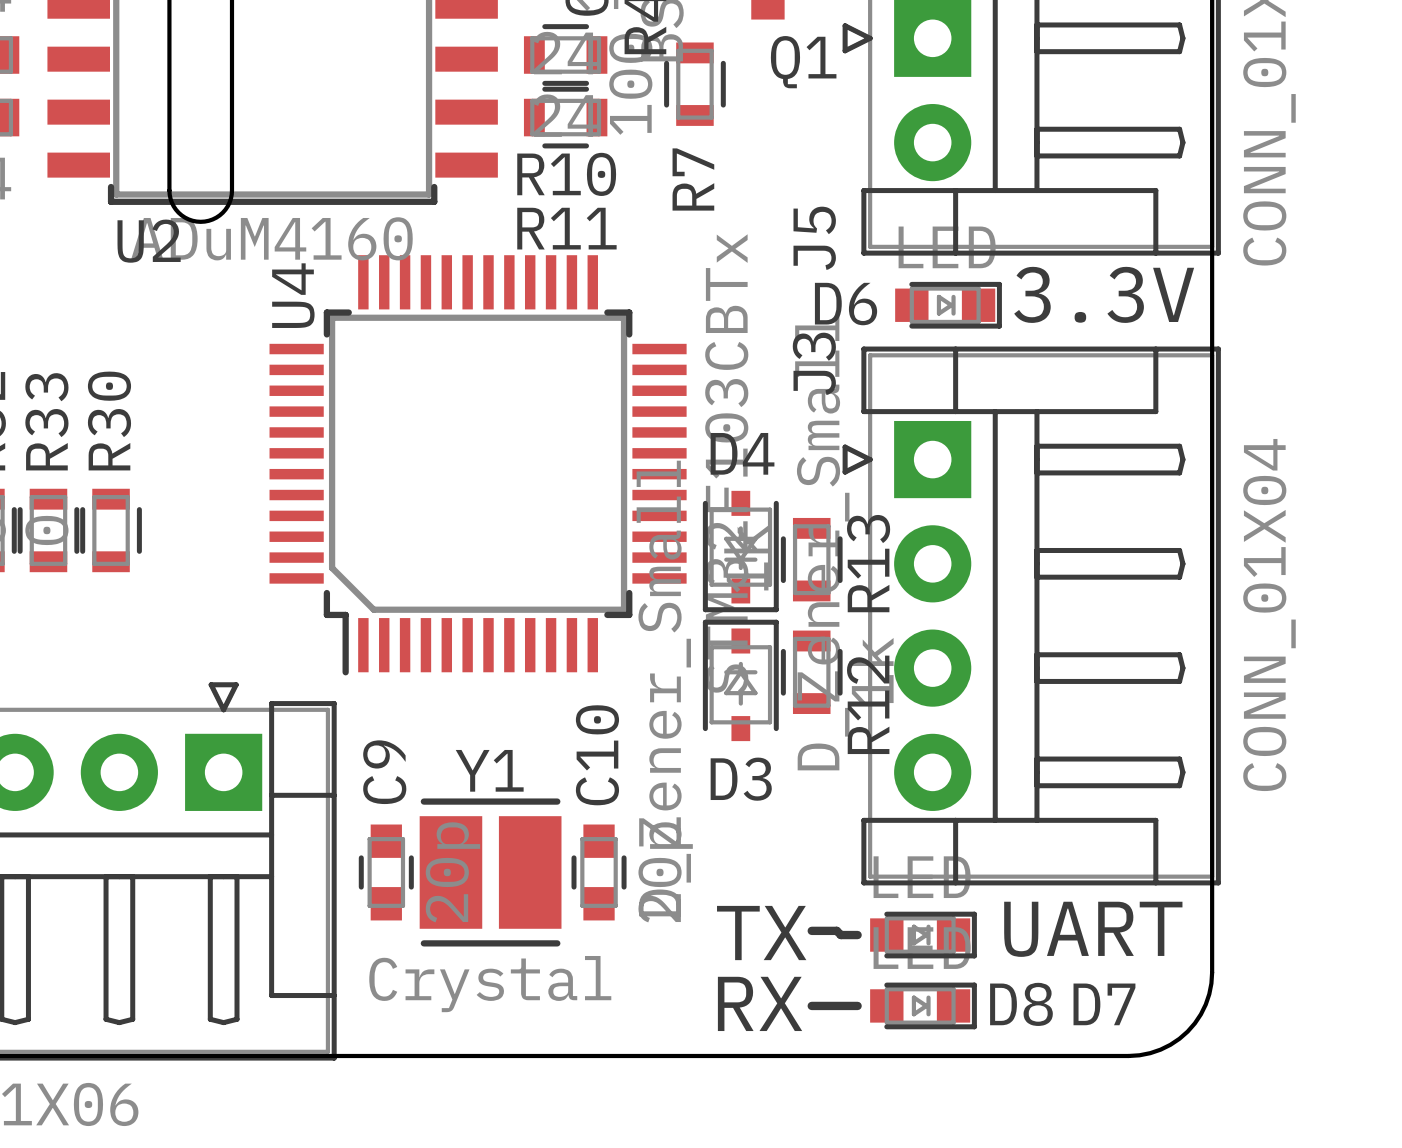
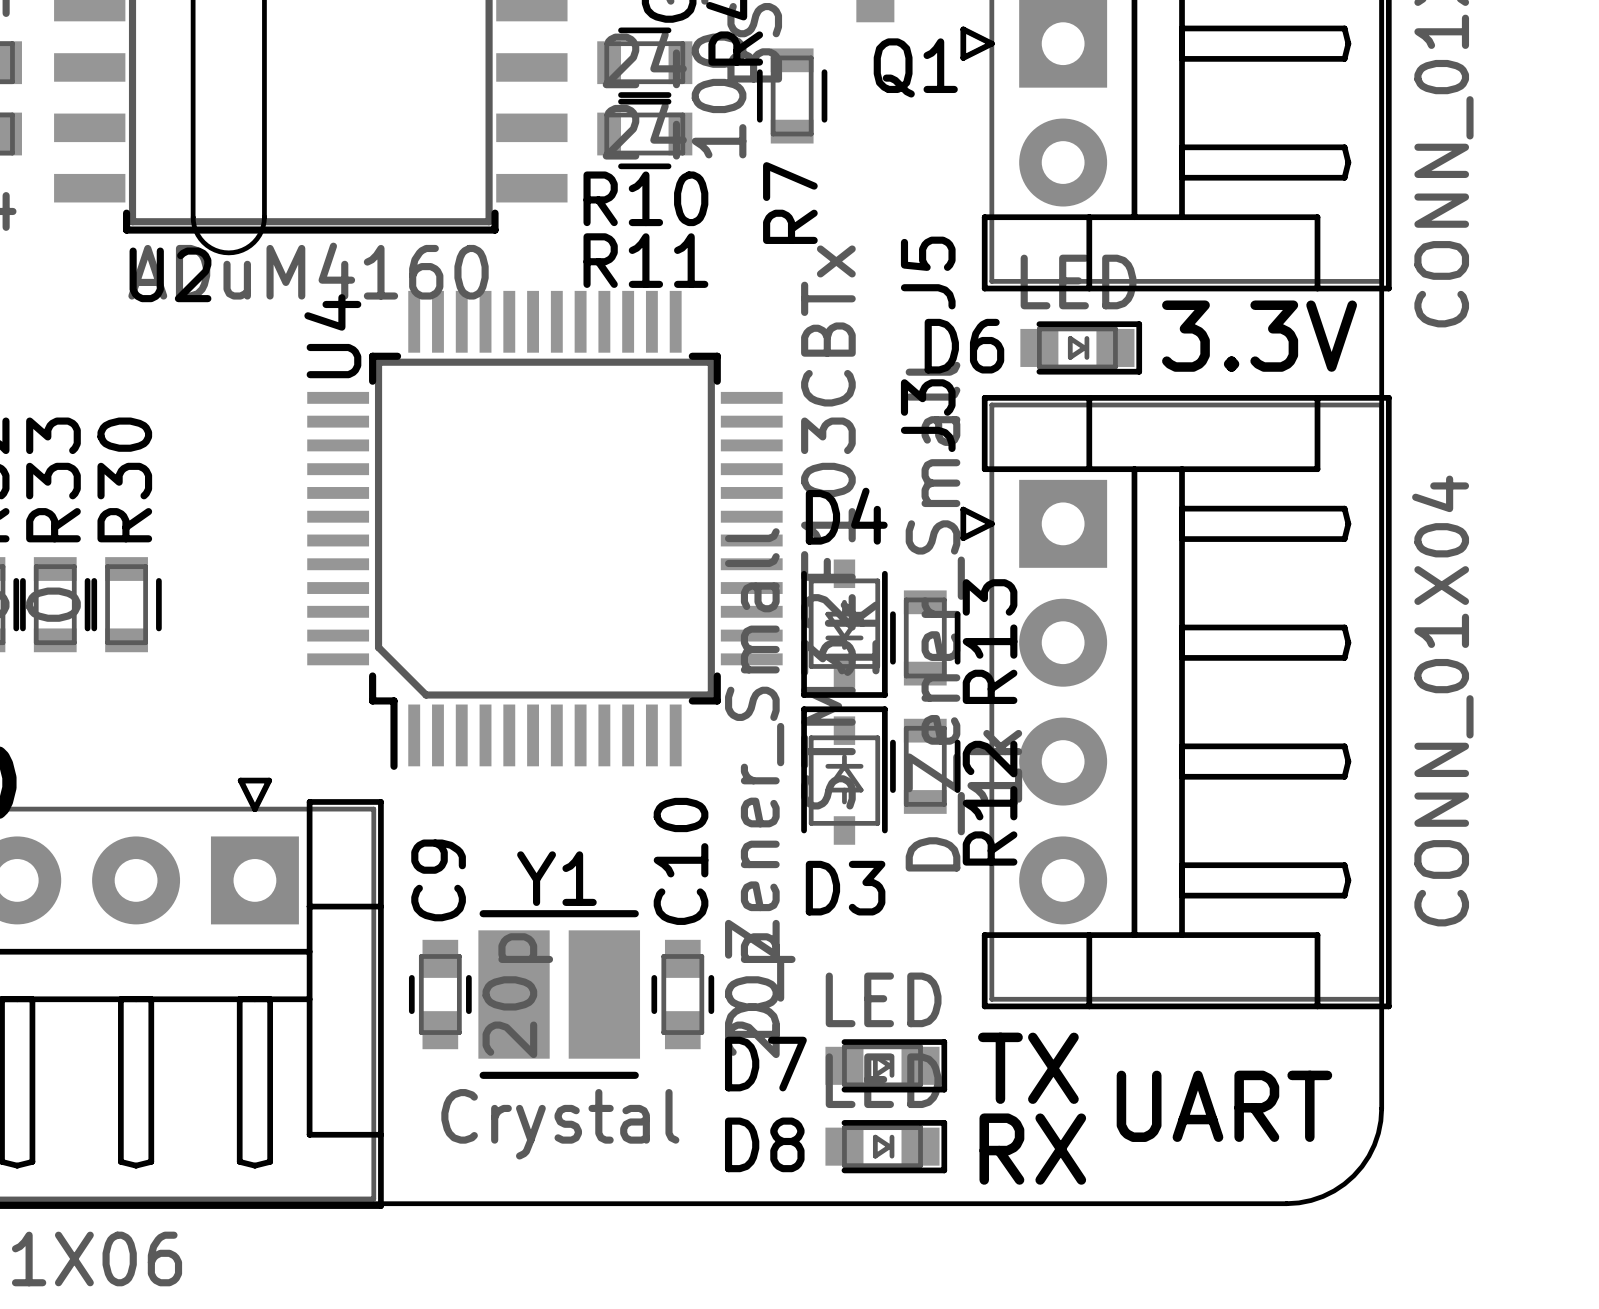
text position: UART (1093, 929) -> UART (1224, 1106)
line: (811, 930) (836, 930) (840, 935) (857, 935) -> none
text position: TX (761, 933) -> TX (1028, 1068)
D7 position: (923, 935) -> (886, 1065)
text position: RX (760, 1003) -> RX (1032, 1149)
D8 name position: D8 (1021, 1004) -> D8 (764, 1144)
D7 name position: D7 (1104, 1004) -> D7 (765, 1064)
line: (811, 1005) (857, 1005) -> none
D8 position: (923, 1005) -> (886, 1146)

